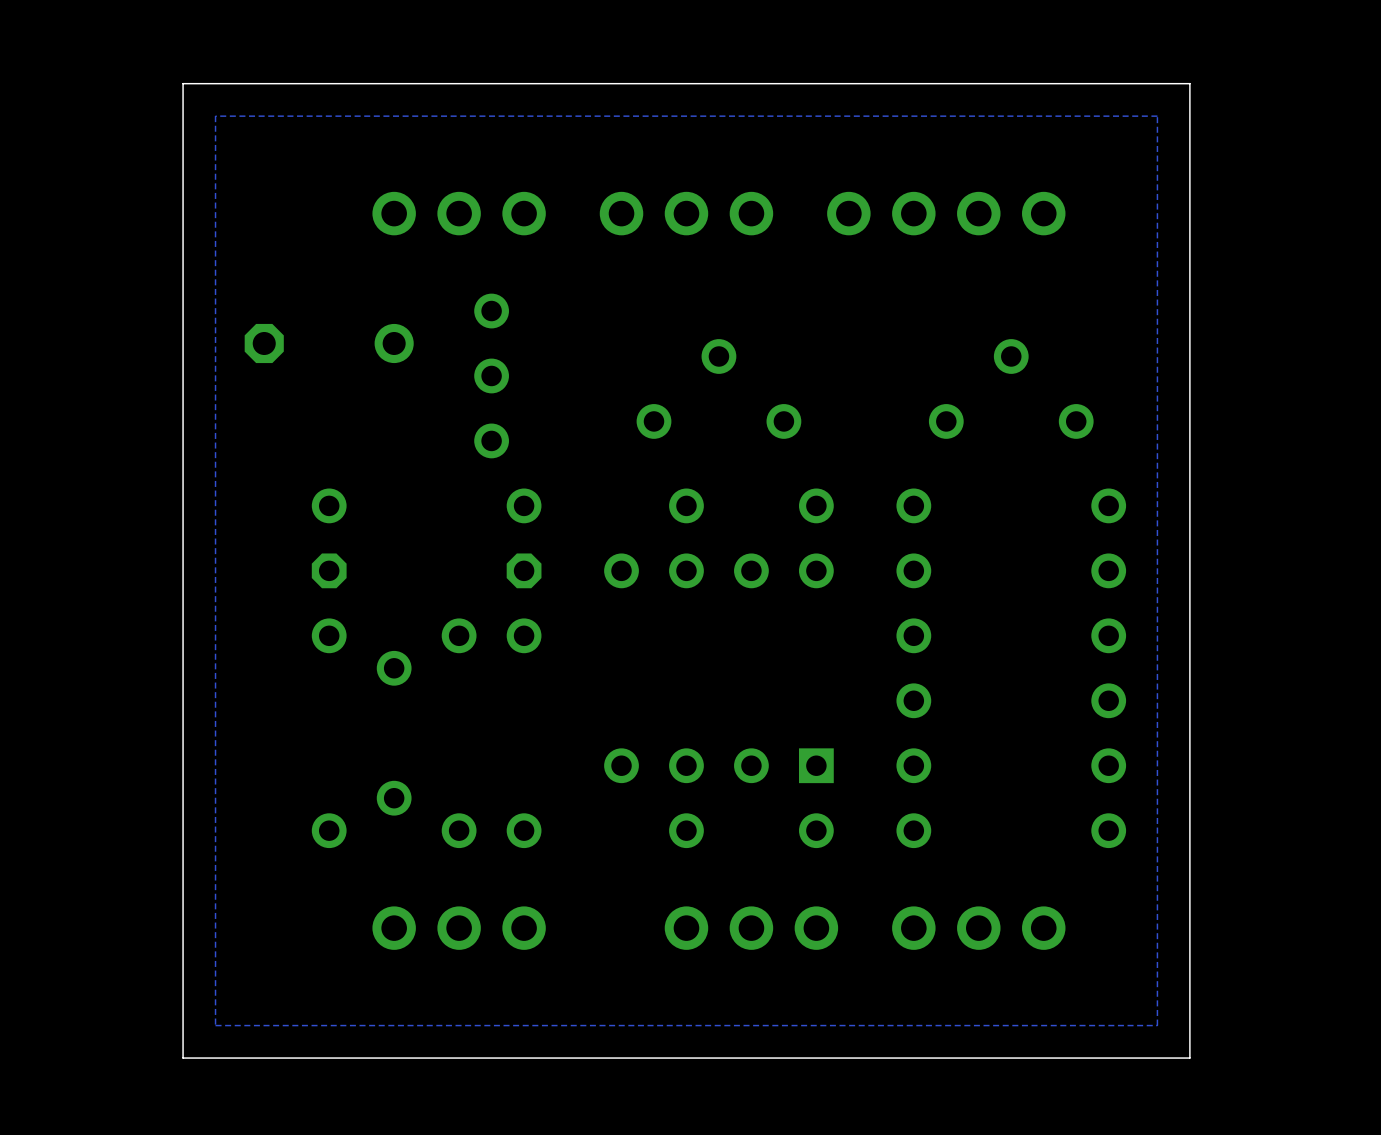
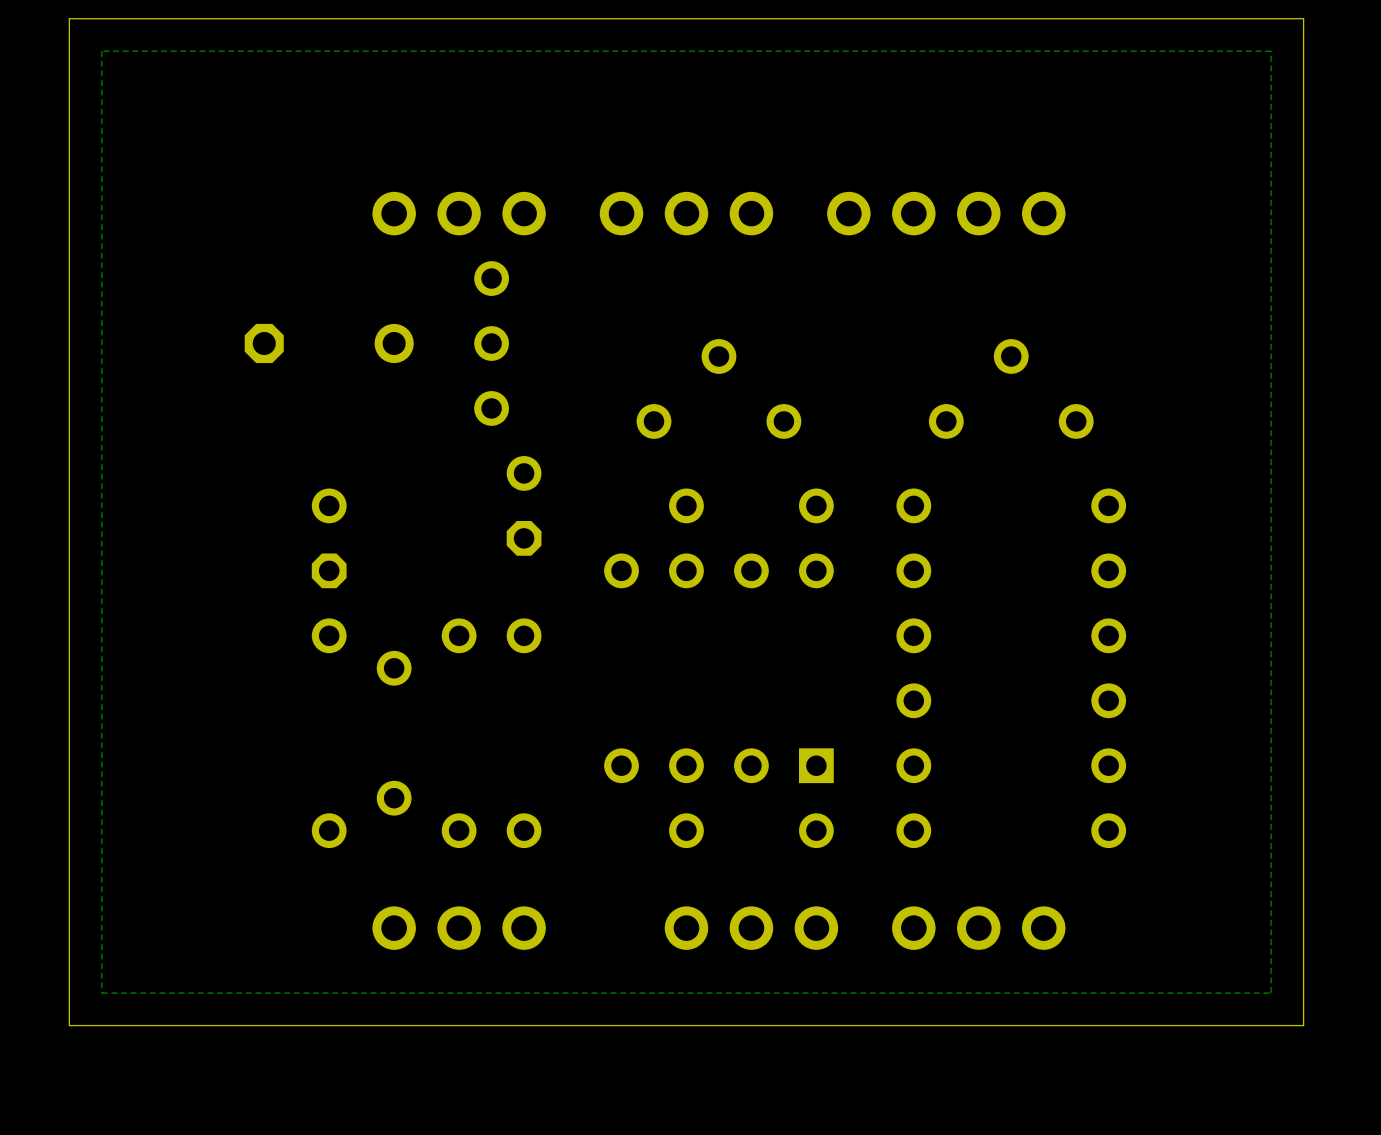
board edge: (1189, 83) (183, 83) (183, 1058) (1189, 1058) (1189, 83) -> (1303, 18) (1303, 1025) (69, 1025) (69, 18) (1303, 18)
zone outline: (1157, 116) (215, 116) (215, 1025) (1157, 1025) (1157, 116) -> (1271, 51) (1271, 993) (101, 993) (101, 51) (1271, 51)
part position: (491, 375) -> (491, 343)
part position: (524, 538) -> (524, 505)

